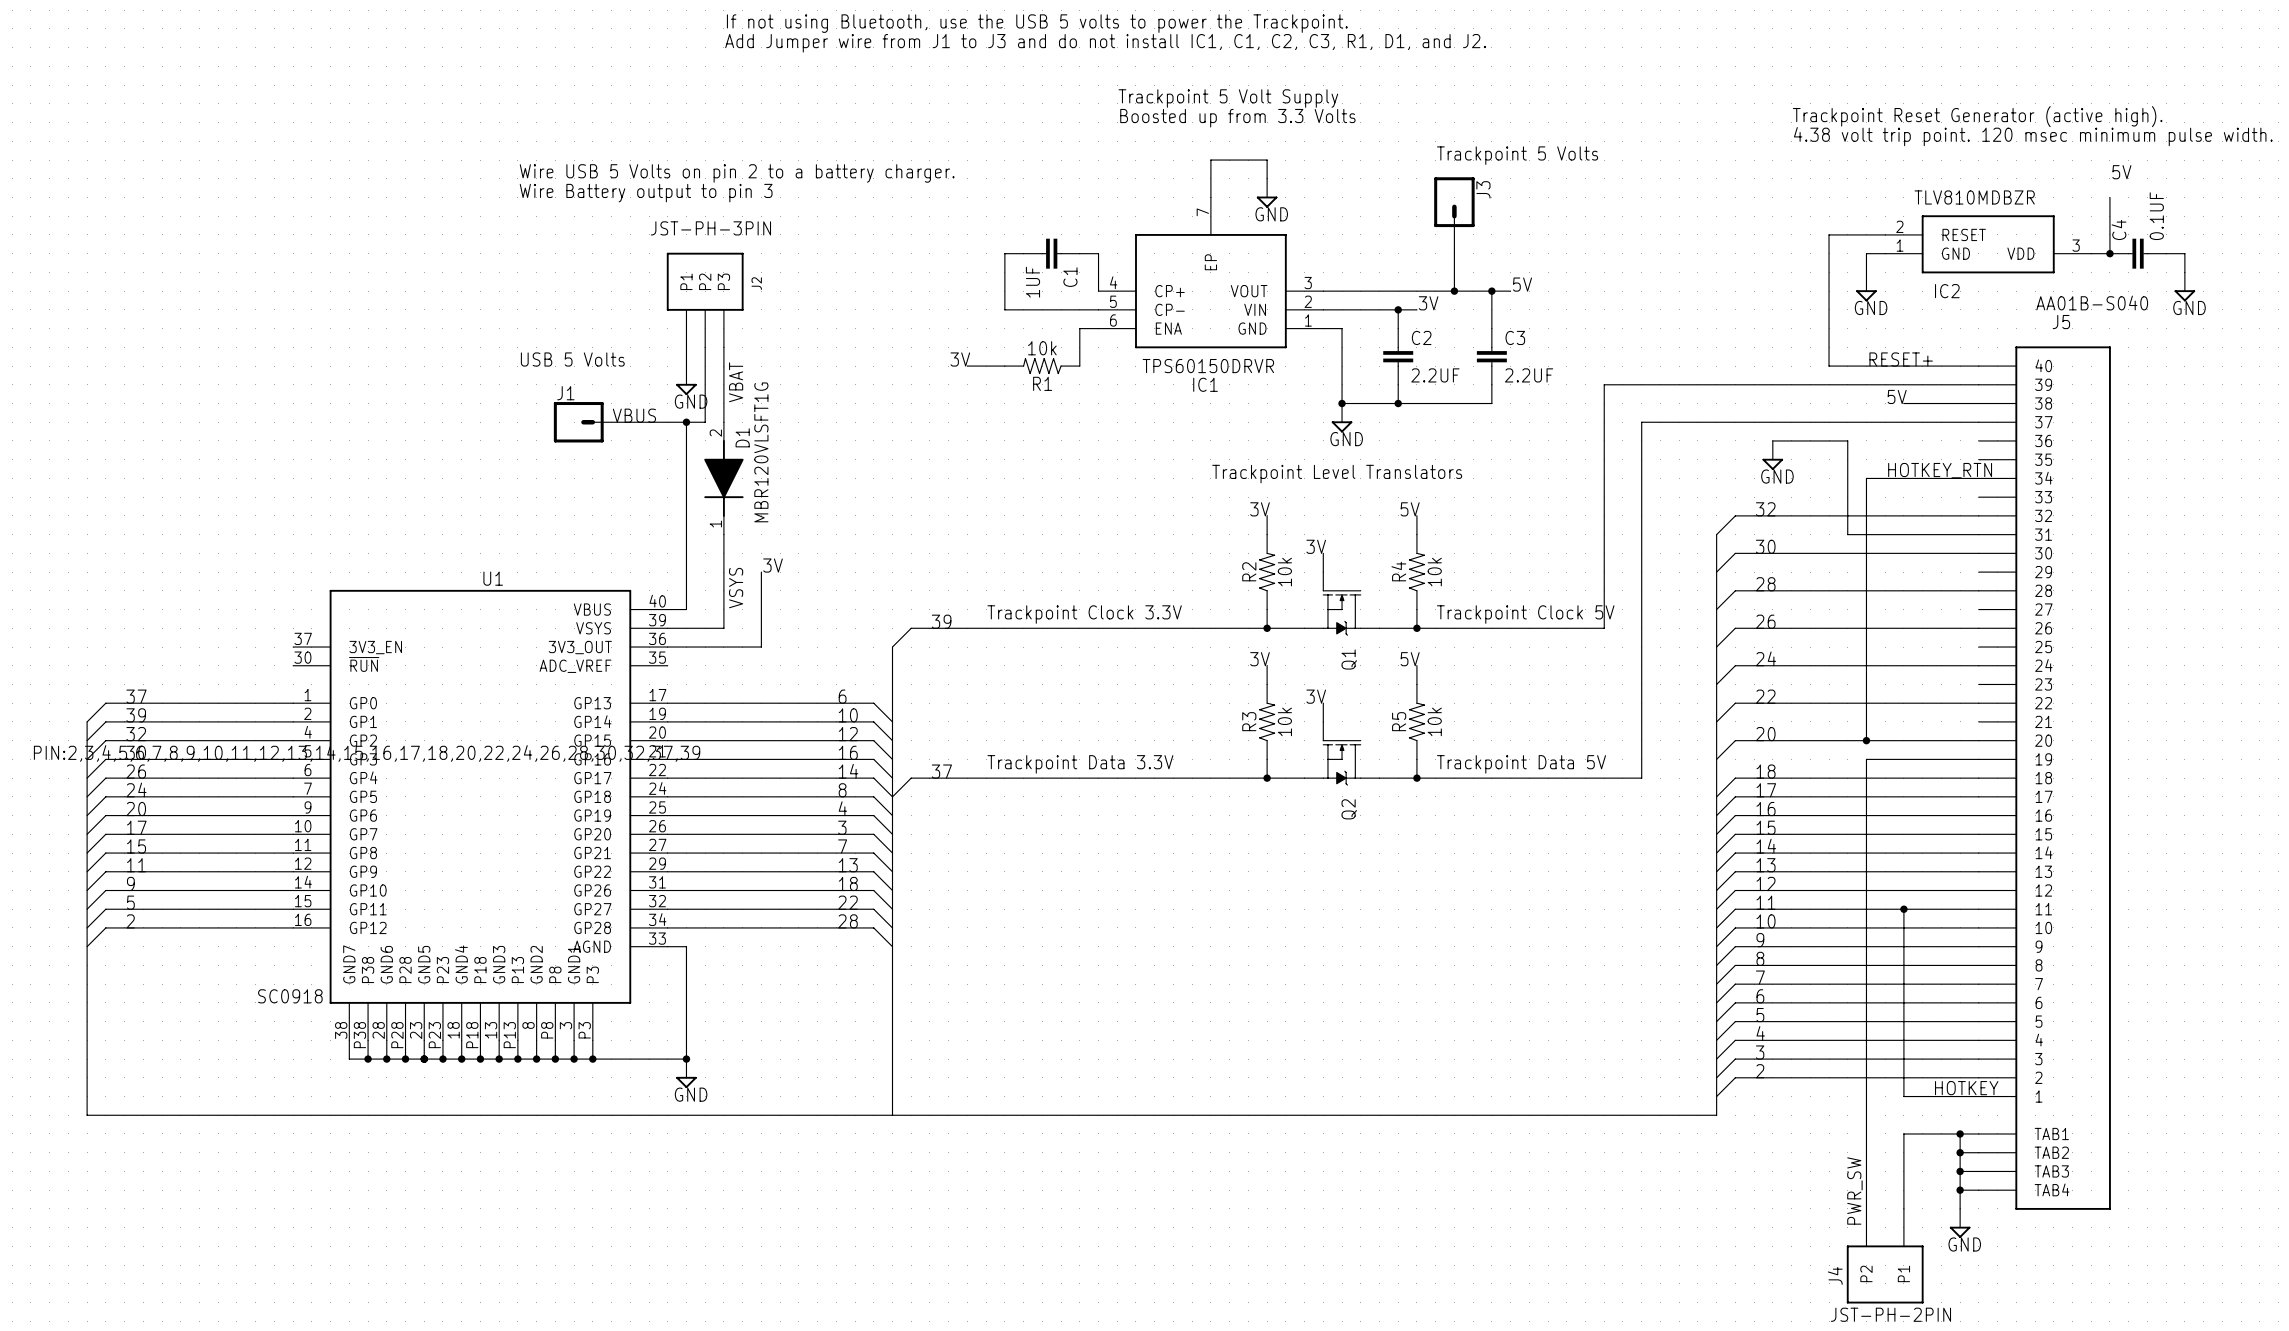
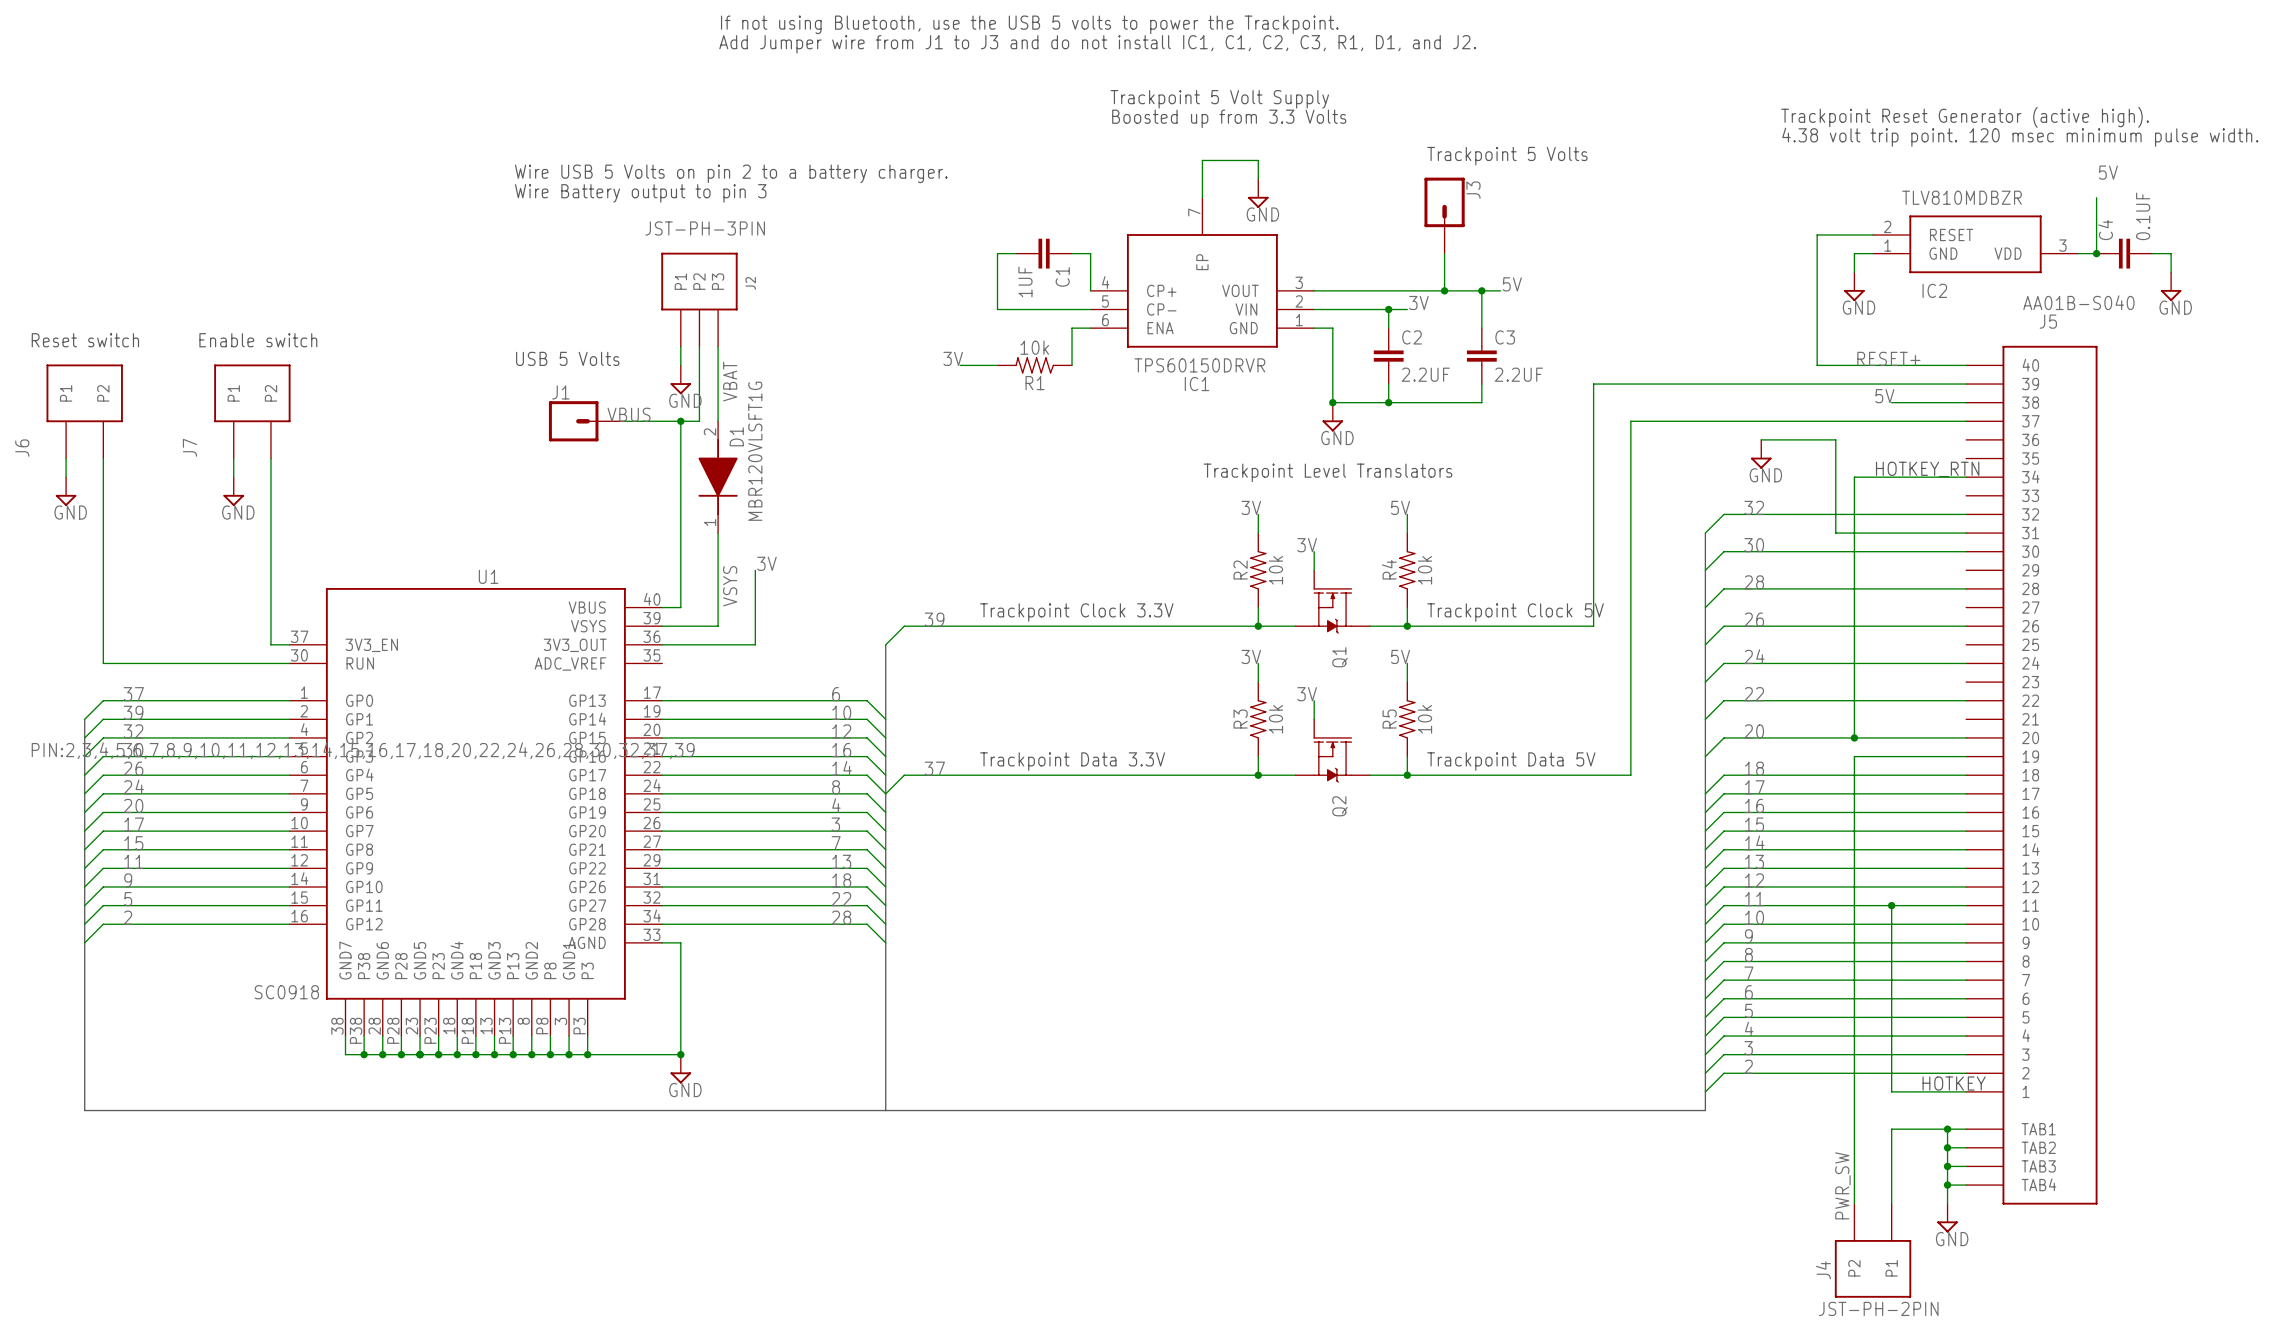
text: none -> Reset switch (85, 340)
text: none -> Enable switch (258, 340)
J6: none -> (84, 411)
J7: none -> (252, 411)
wire: none -> (66, 458) (66, 477)
wire: none -> (103, 458) (103, 663) (289, 663)
wire: none -> (233, 458) (233, 477)
wire: none -> (270, 458) (270, 644) (289, 644)
power symbol: none -> GND (66, 491)
power symbol: none -> GND (233, 491)
U1 pin name: ~{RUN} (364, 664) -> RUN (360, 663)

